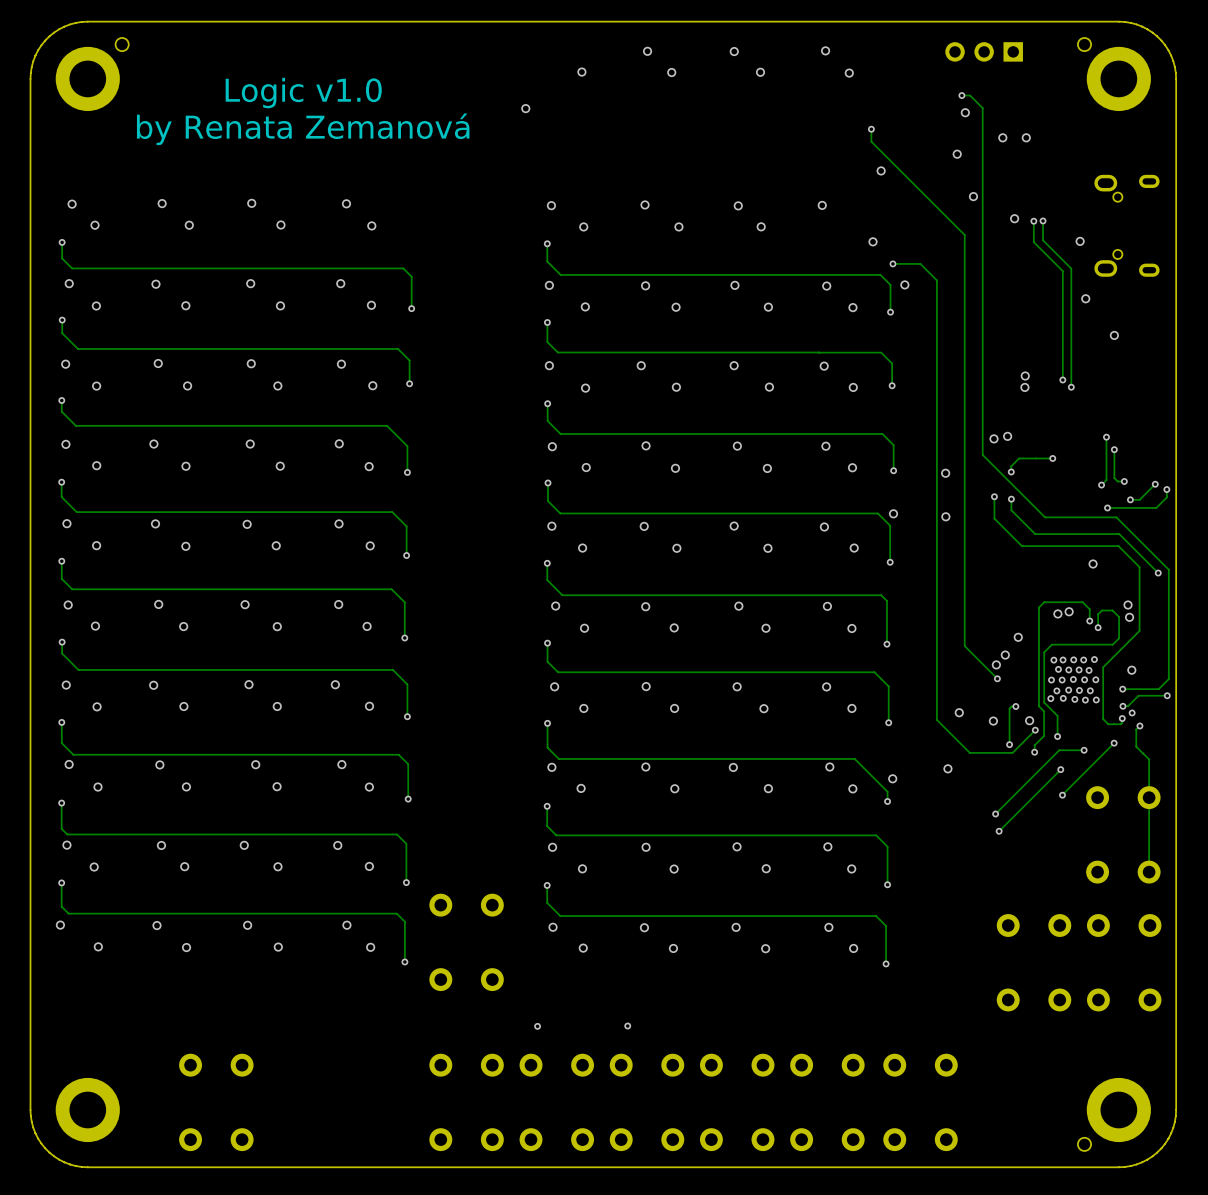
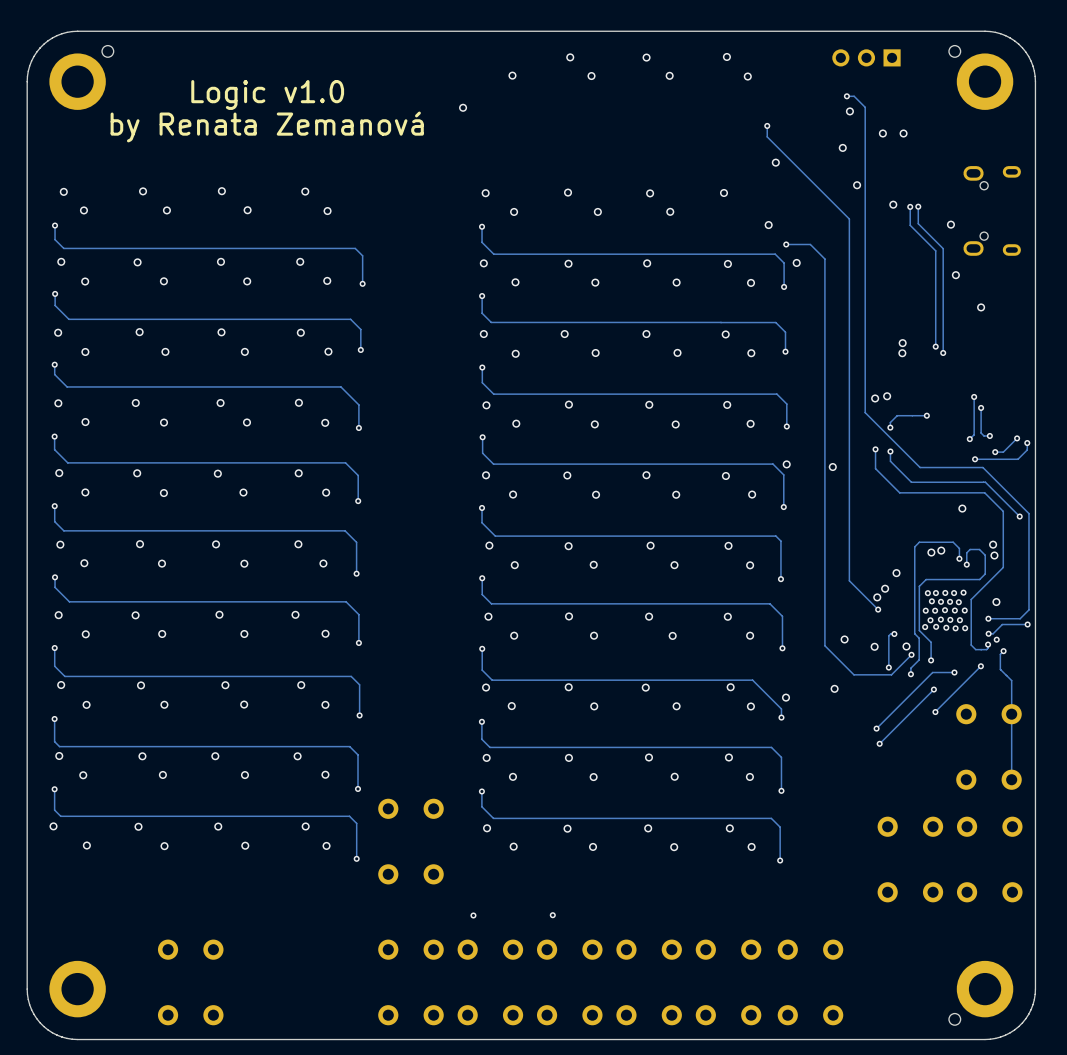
via: (945, 473) -> none

